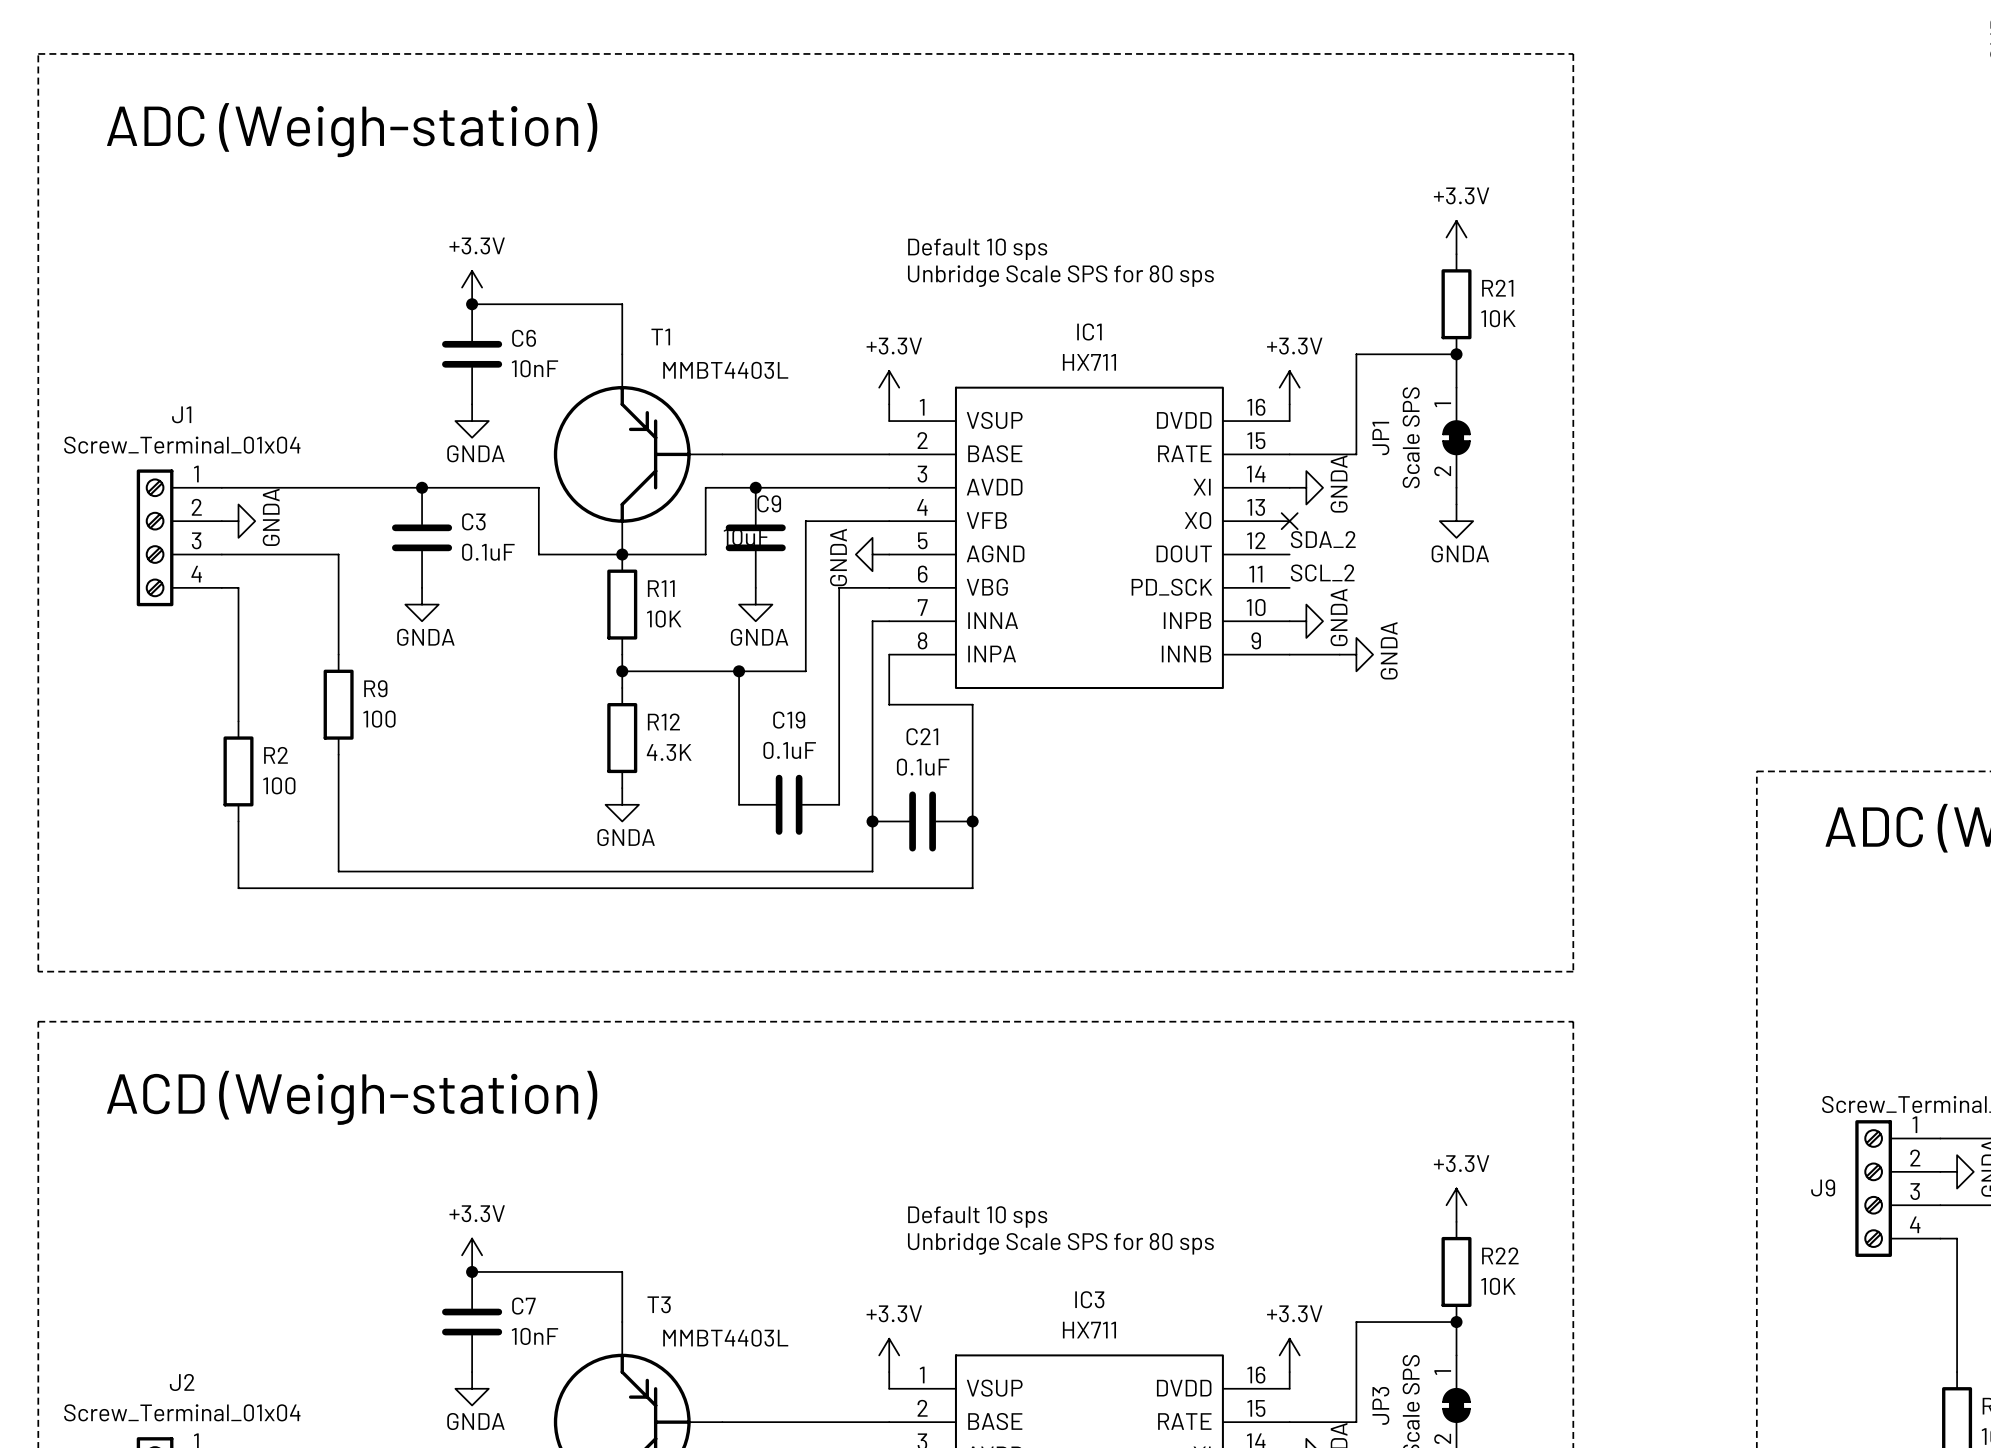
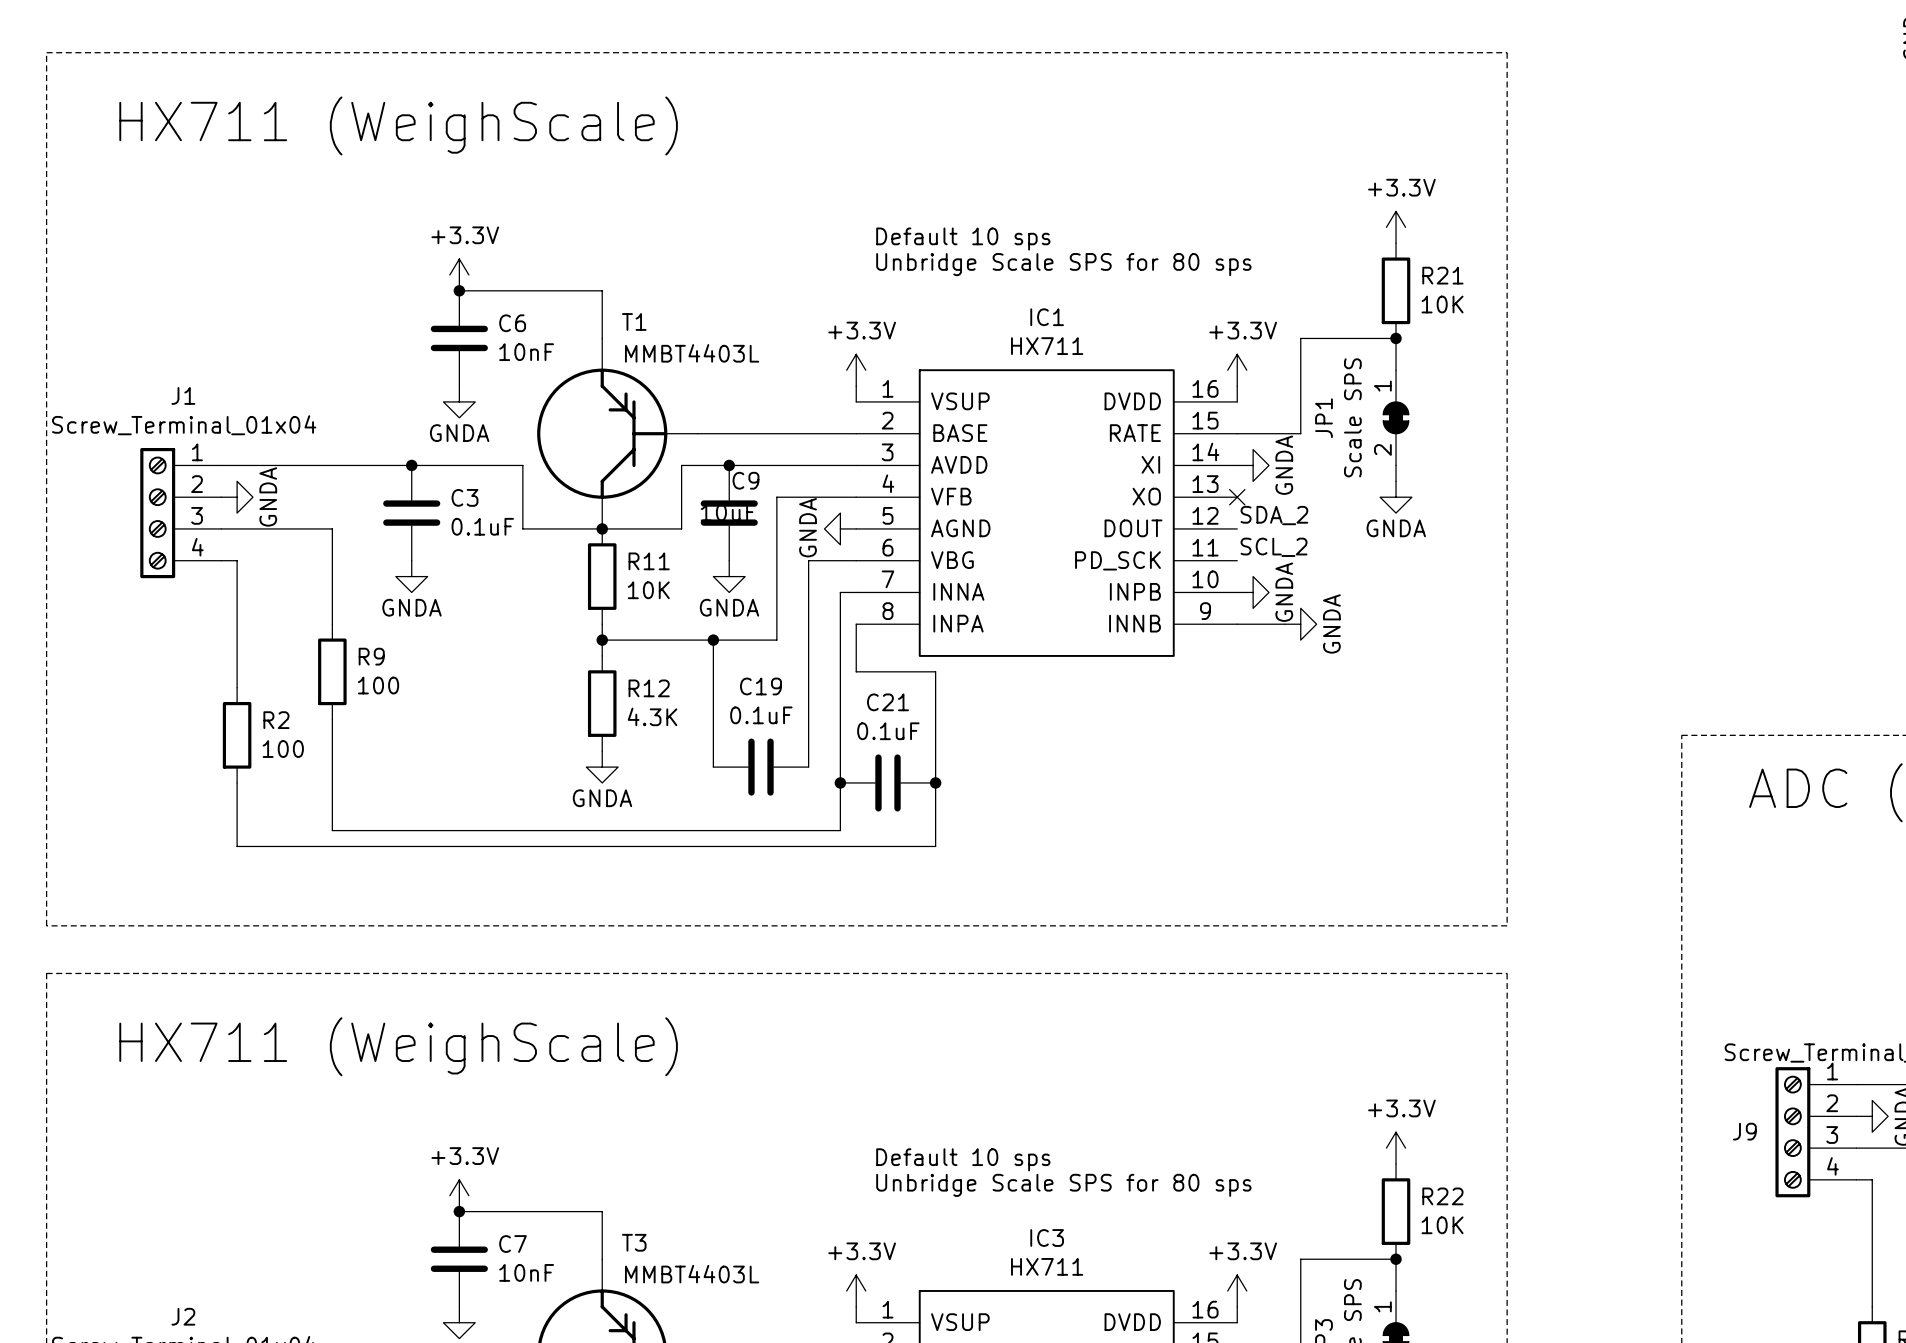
text: ADC (Weigh-station) (352, 130) -> HX711 (WeighScale) (398, 125)
text: ACD (Weigh-station) (352, 1097) -> HX711 (WeighScale) (398, 1046)

